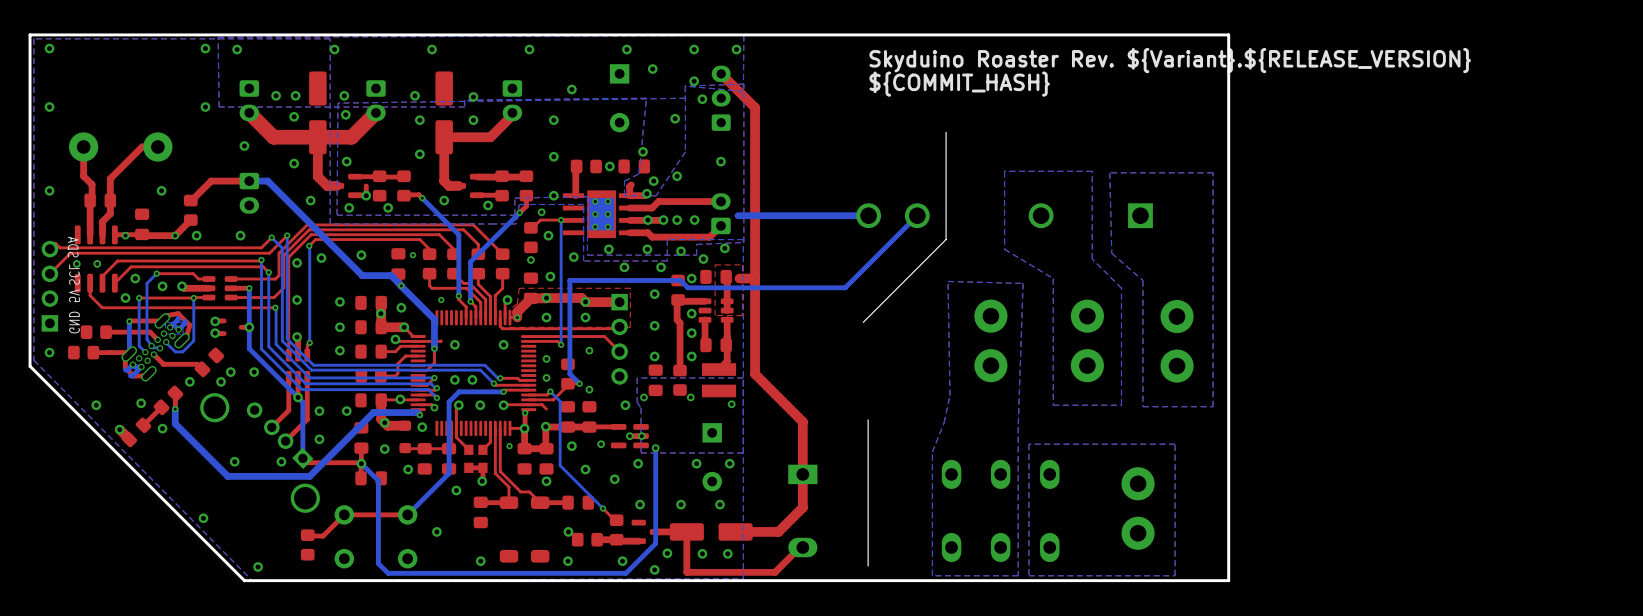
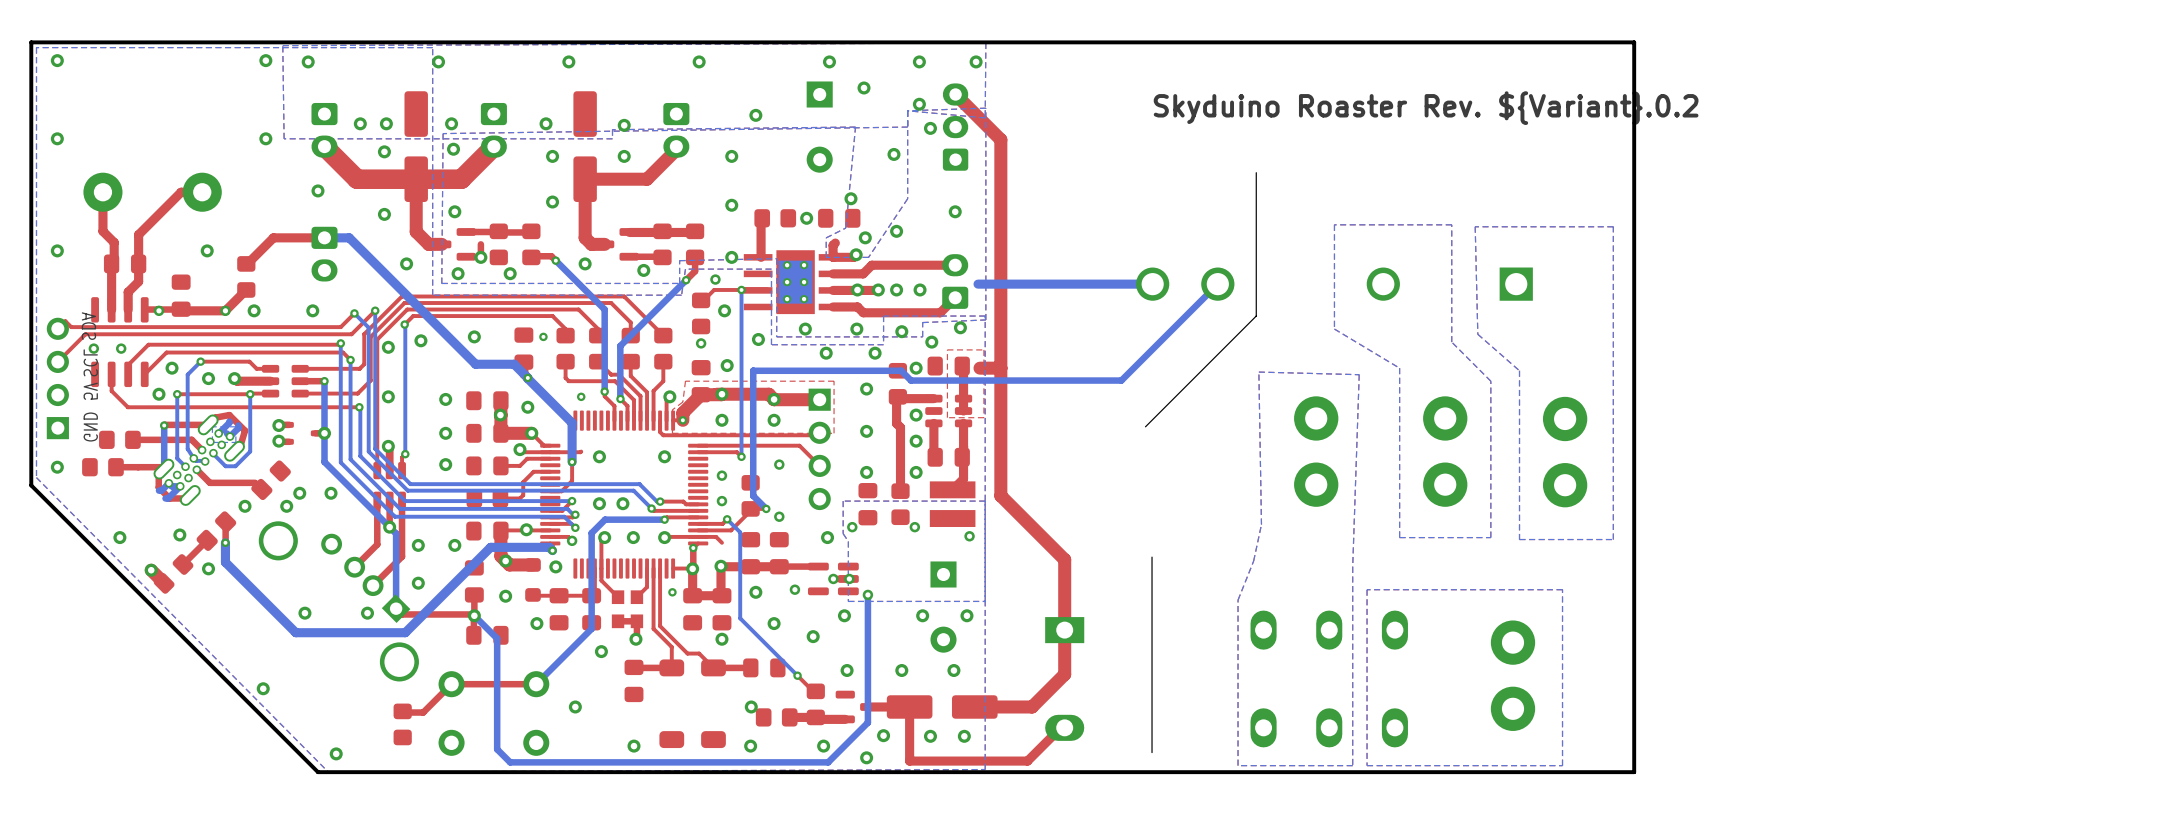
text: Skyduino Roaster Rev. ${Variant}.${RELEASE_VERSION} (1170, 60) -> none
text: ${COMMIT_HASH} (959, 84) -> Skyduino Roaster Rev. ${Variant}.0.2 (1426, 108)

